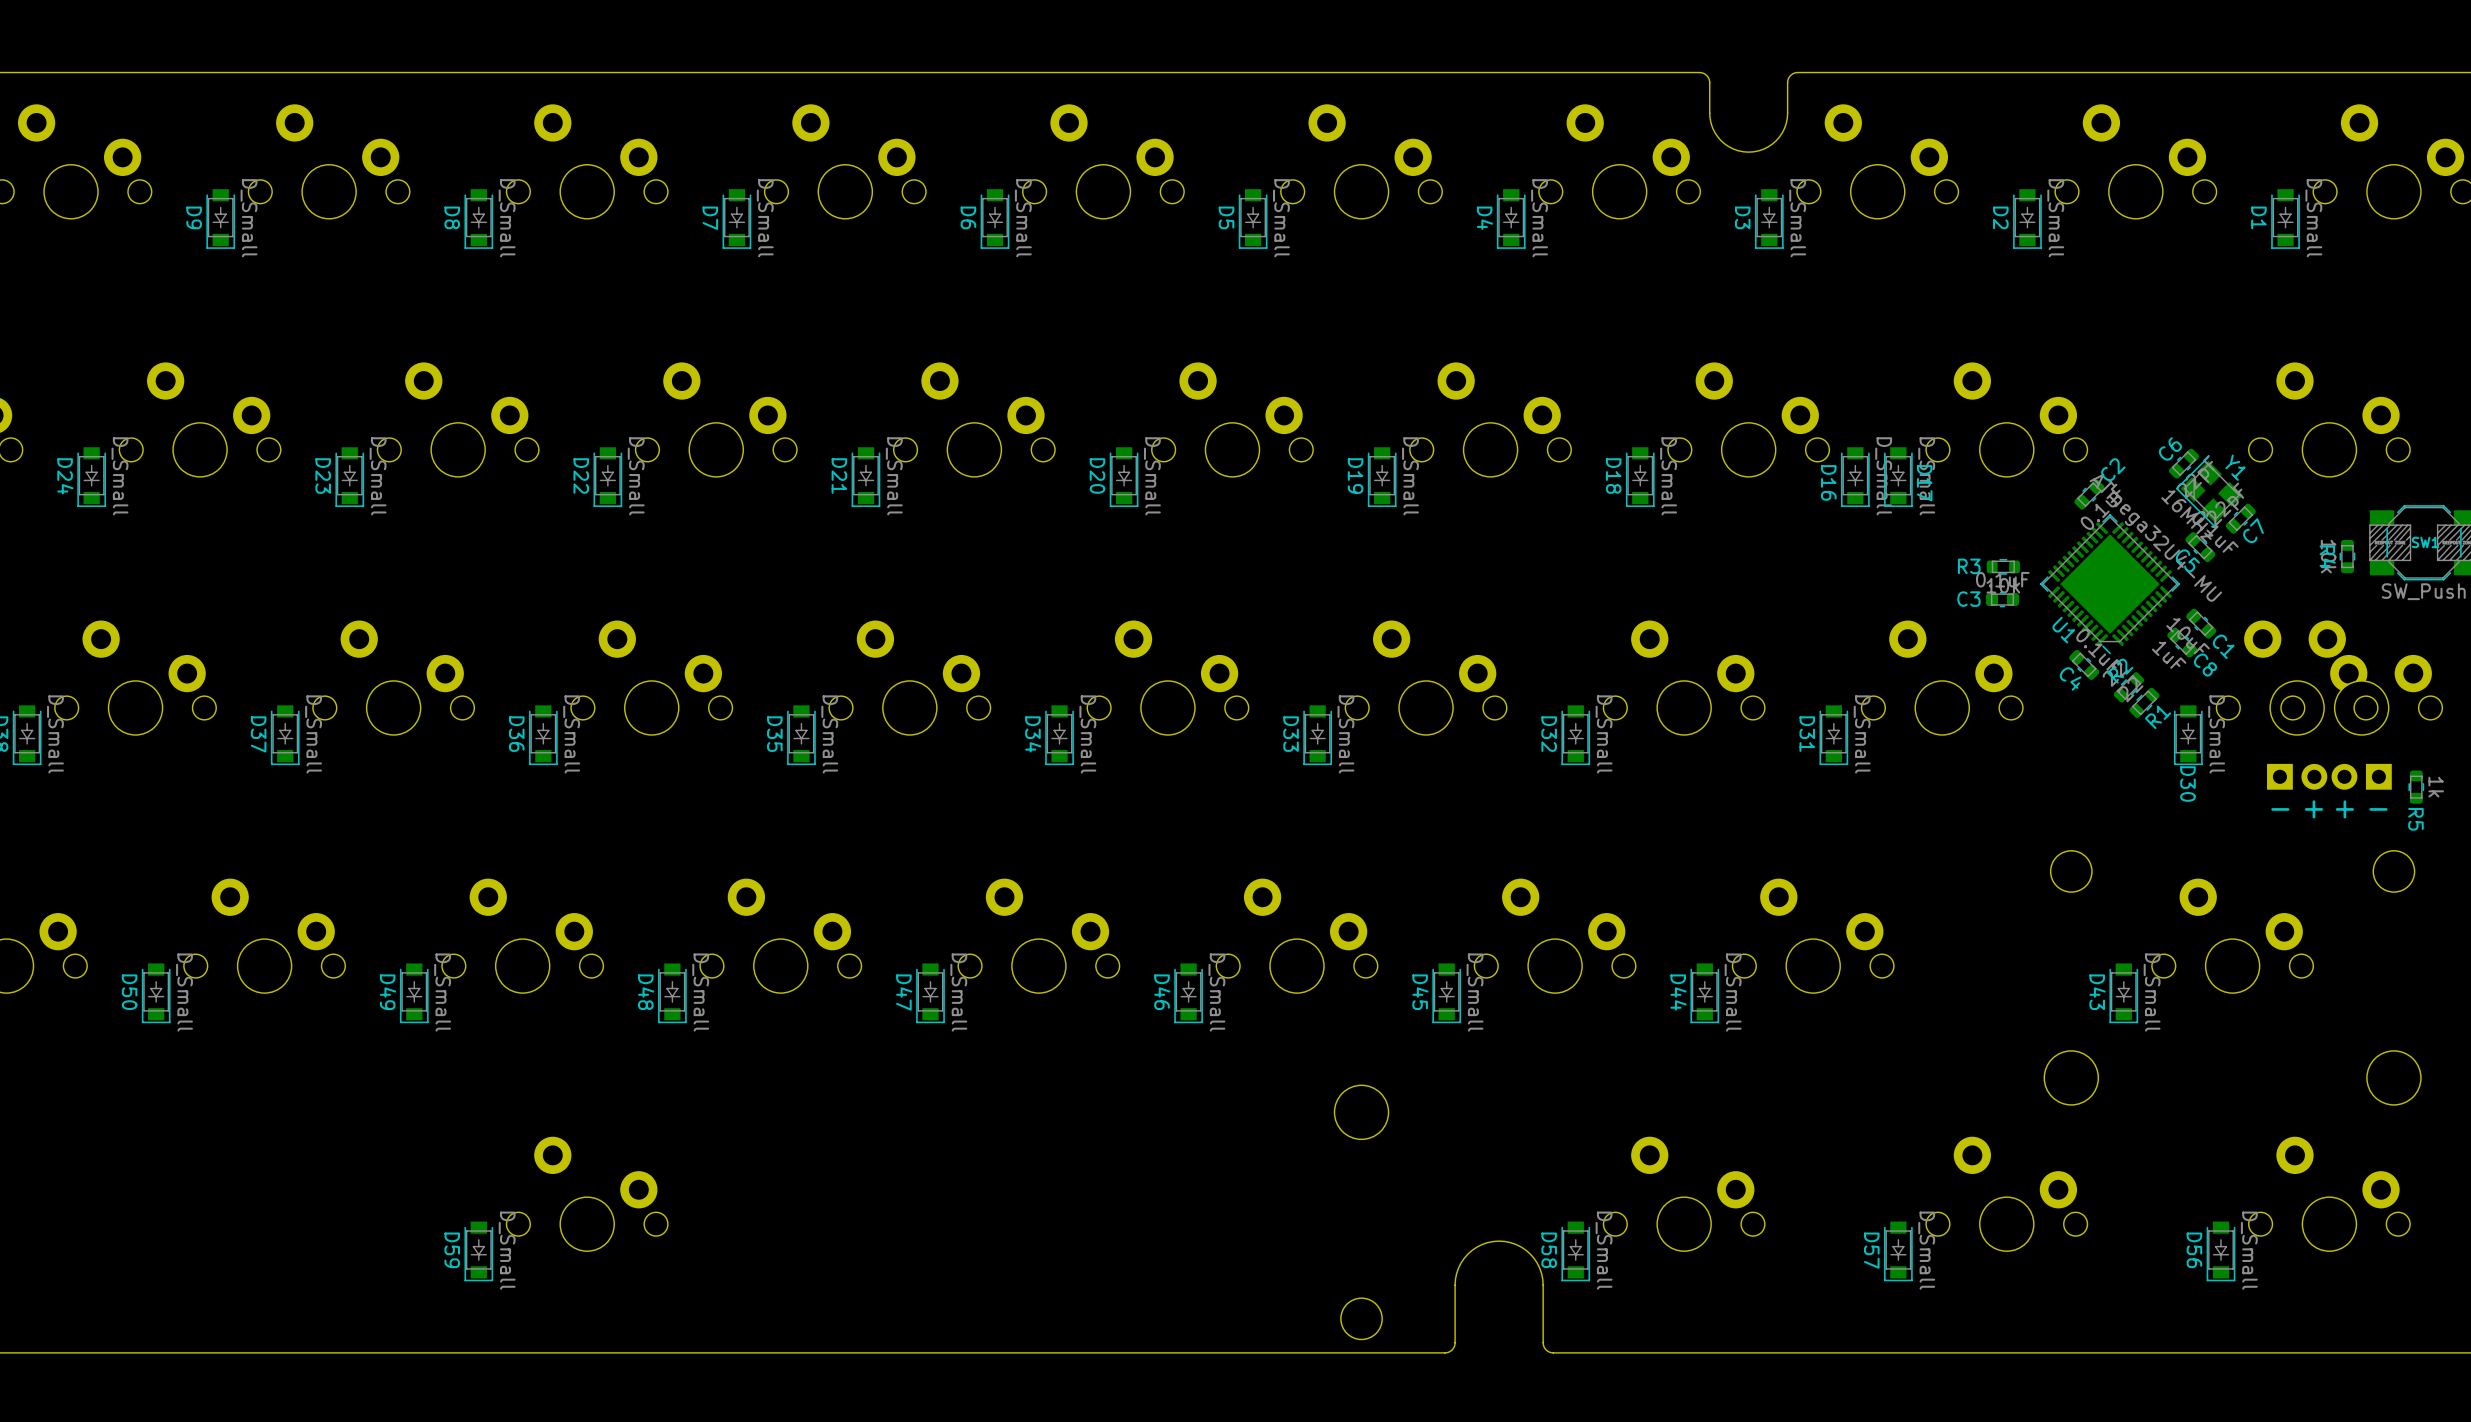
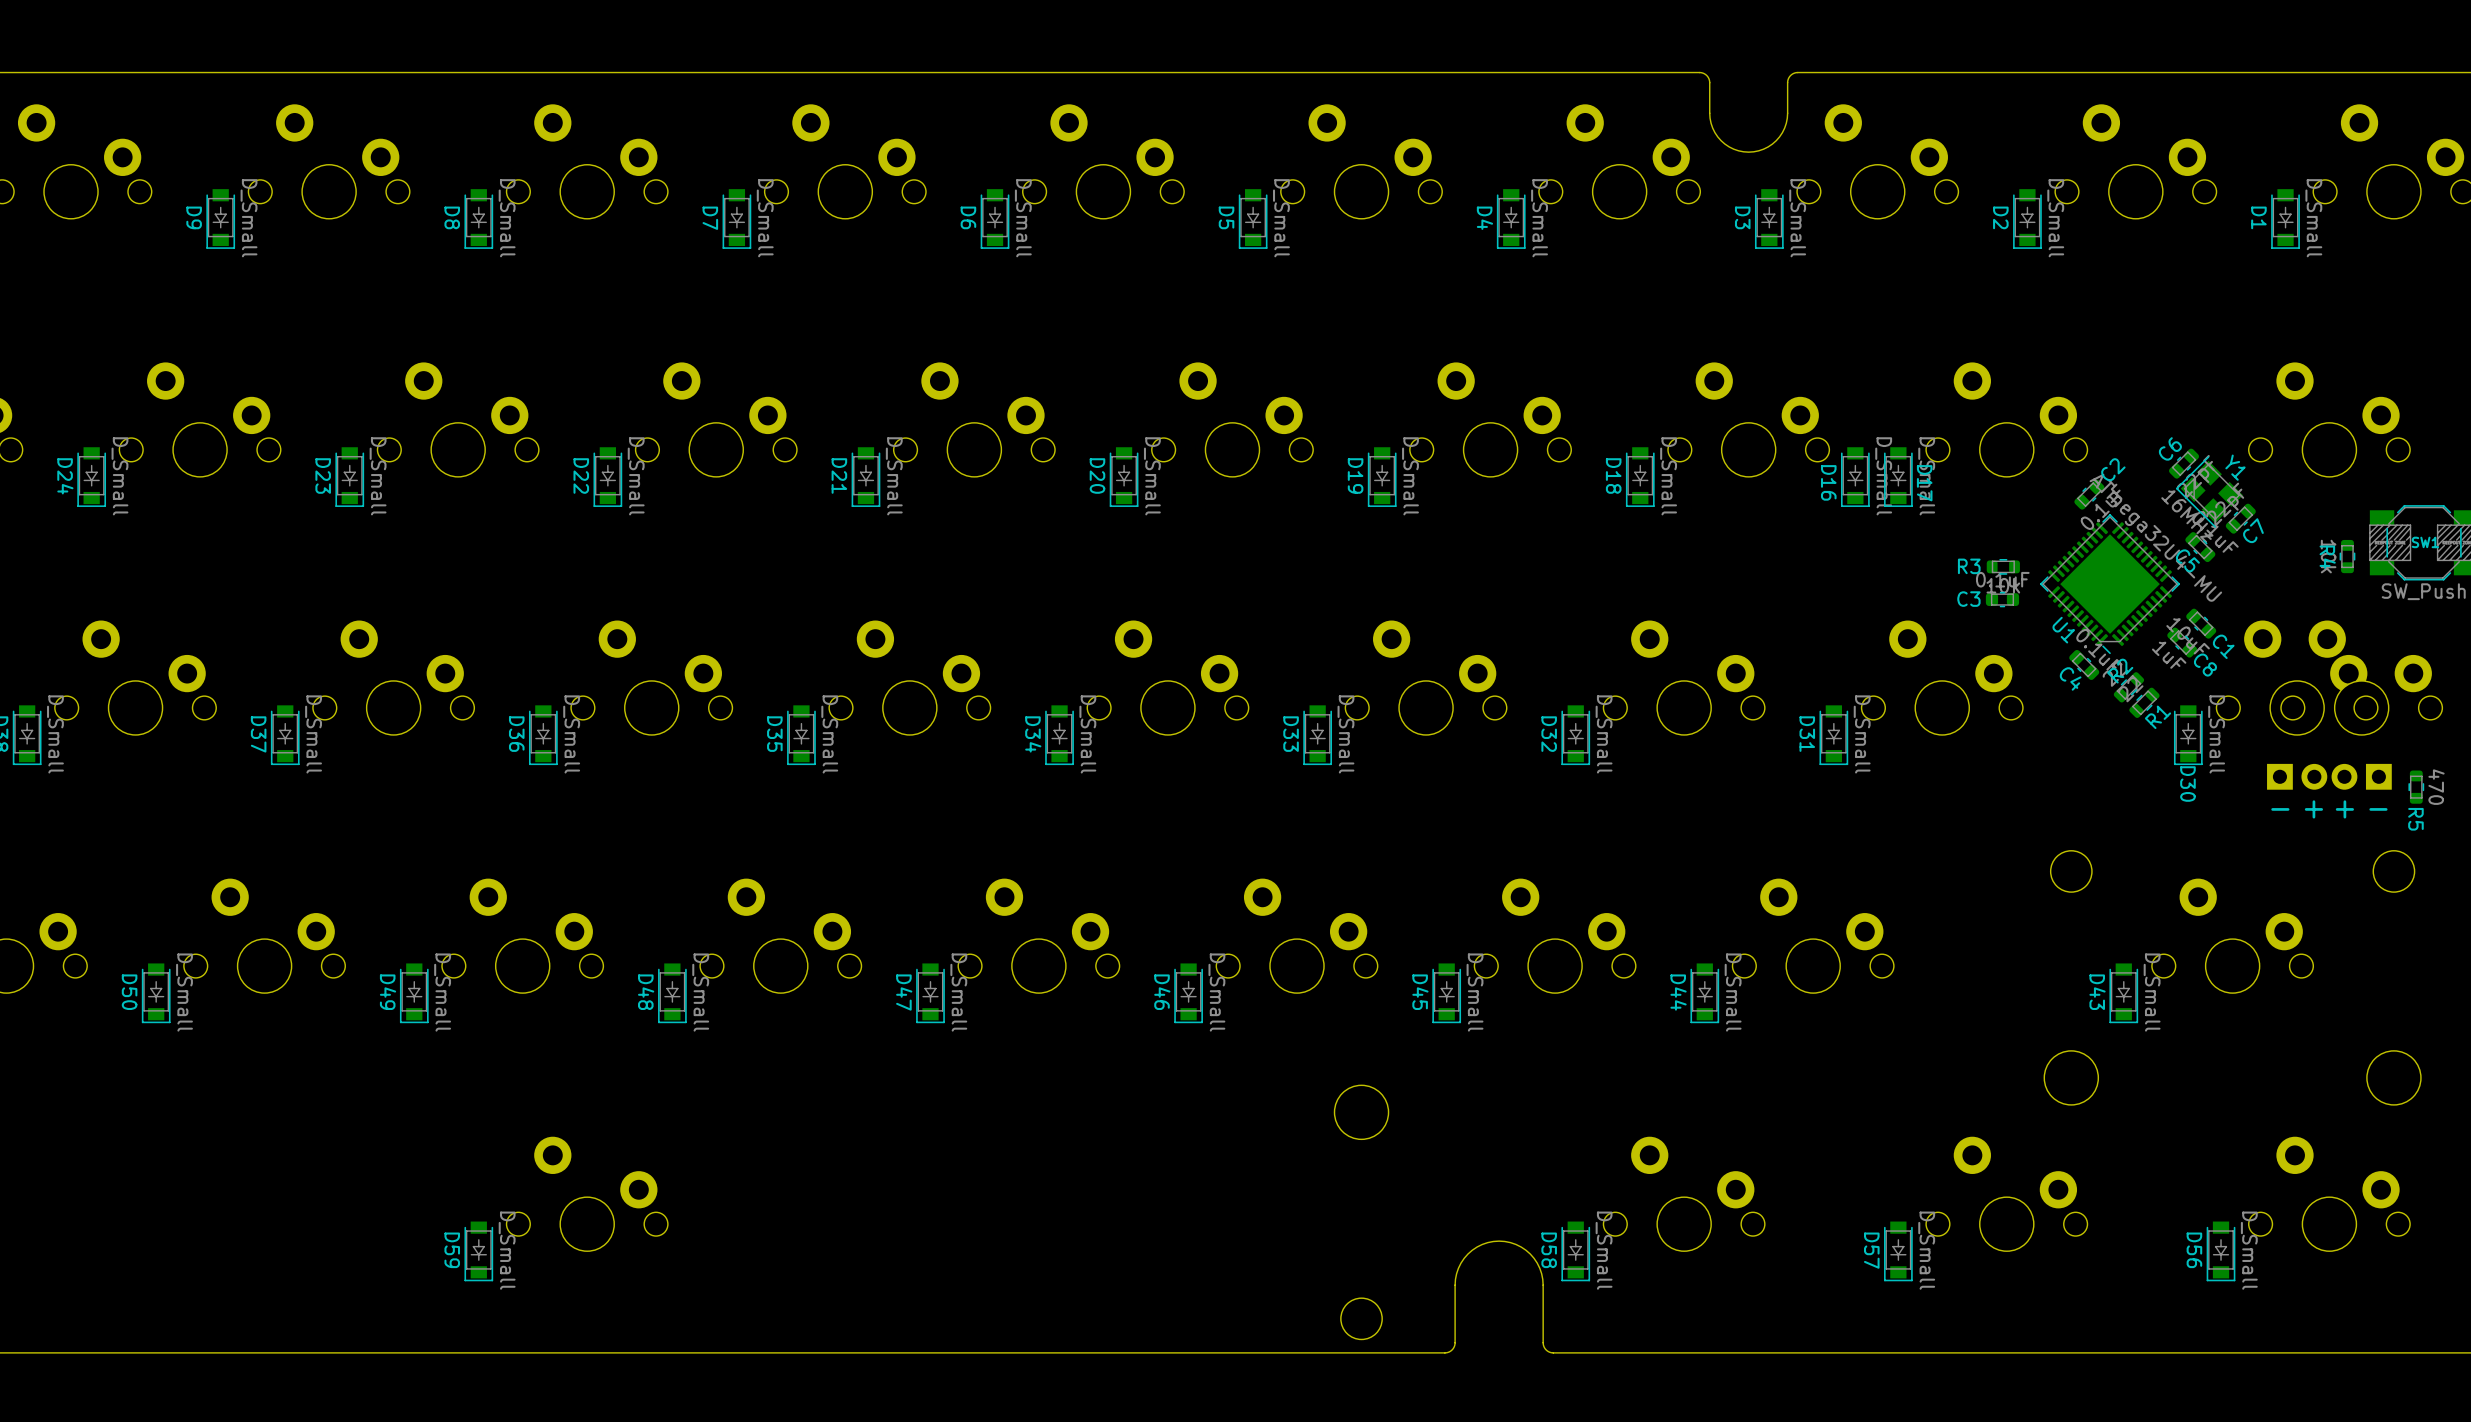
R5 value: 1k (2436, 787) -> 470 (2436, 787)

